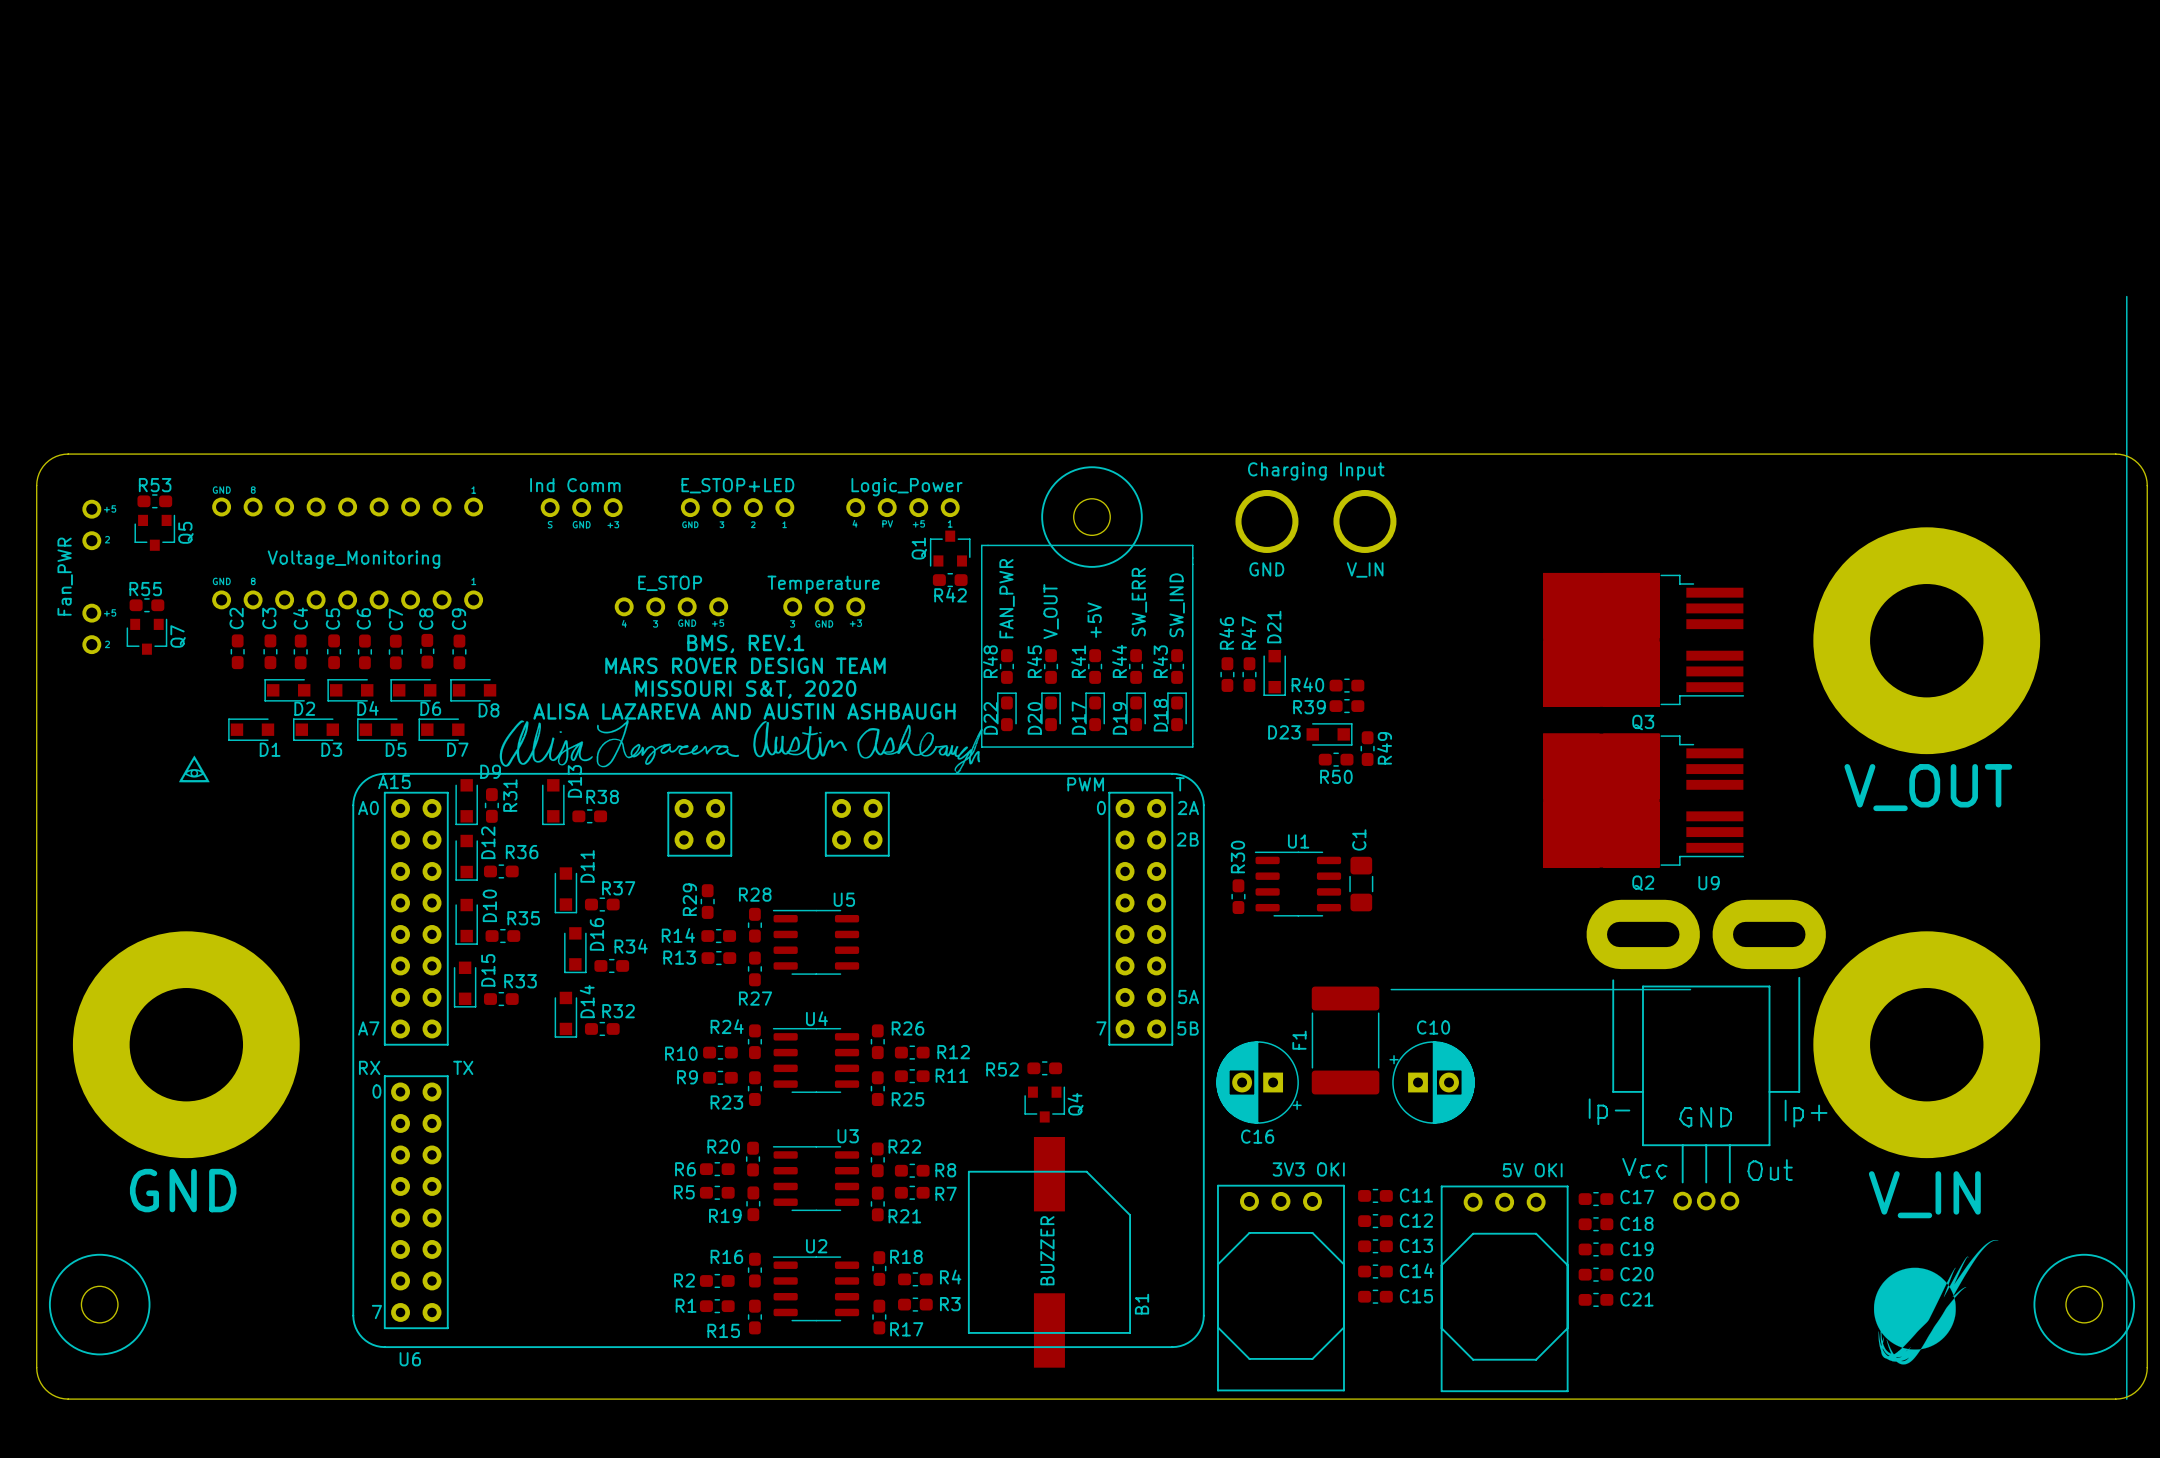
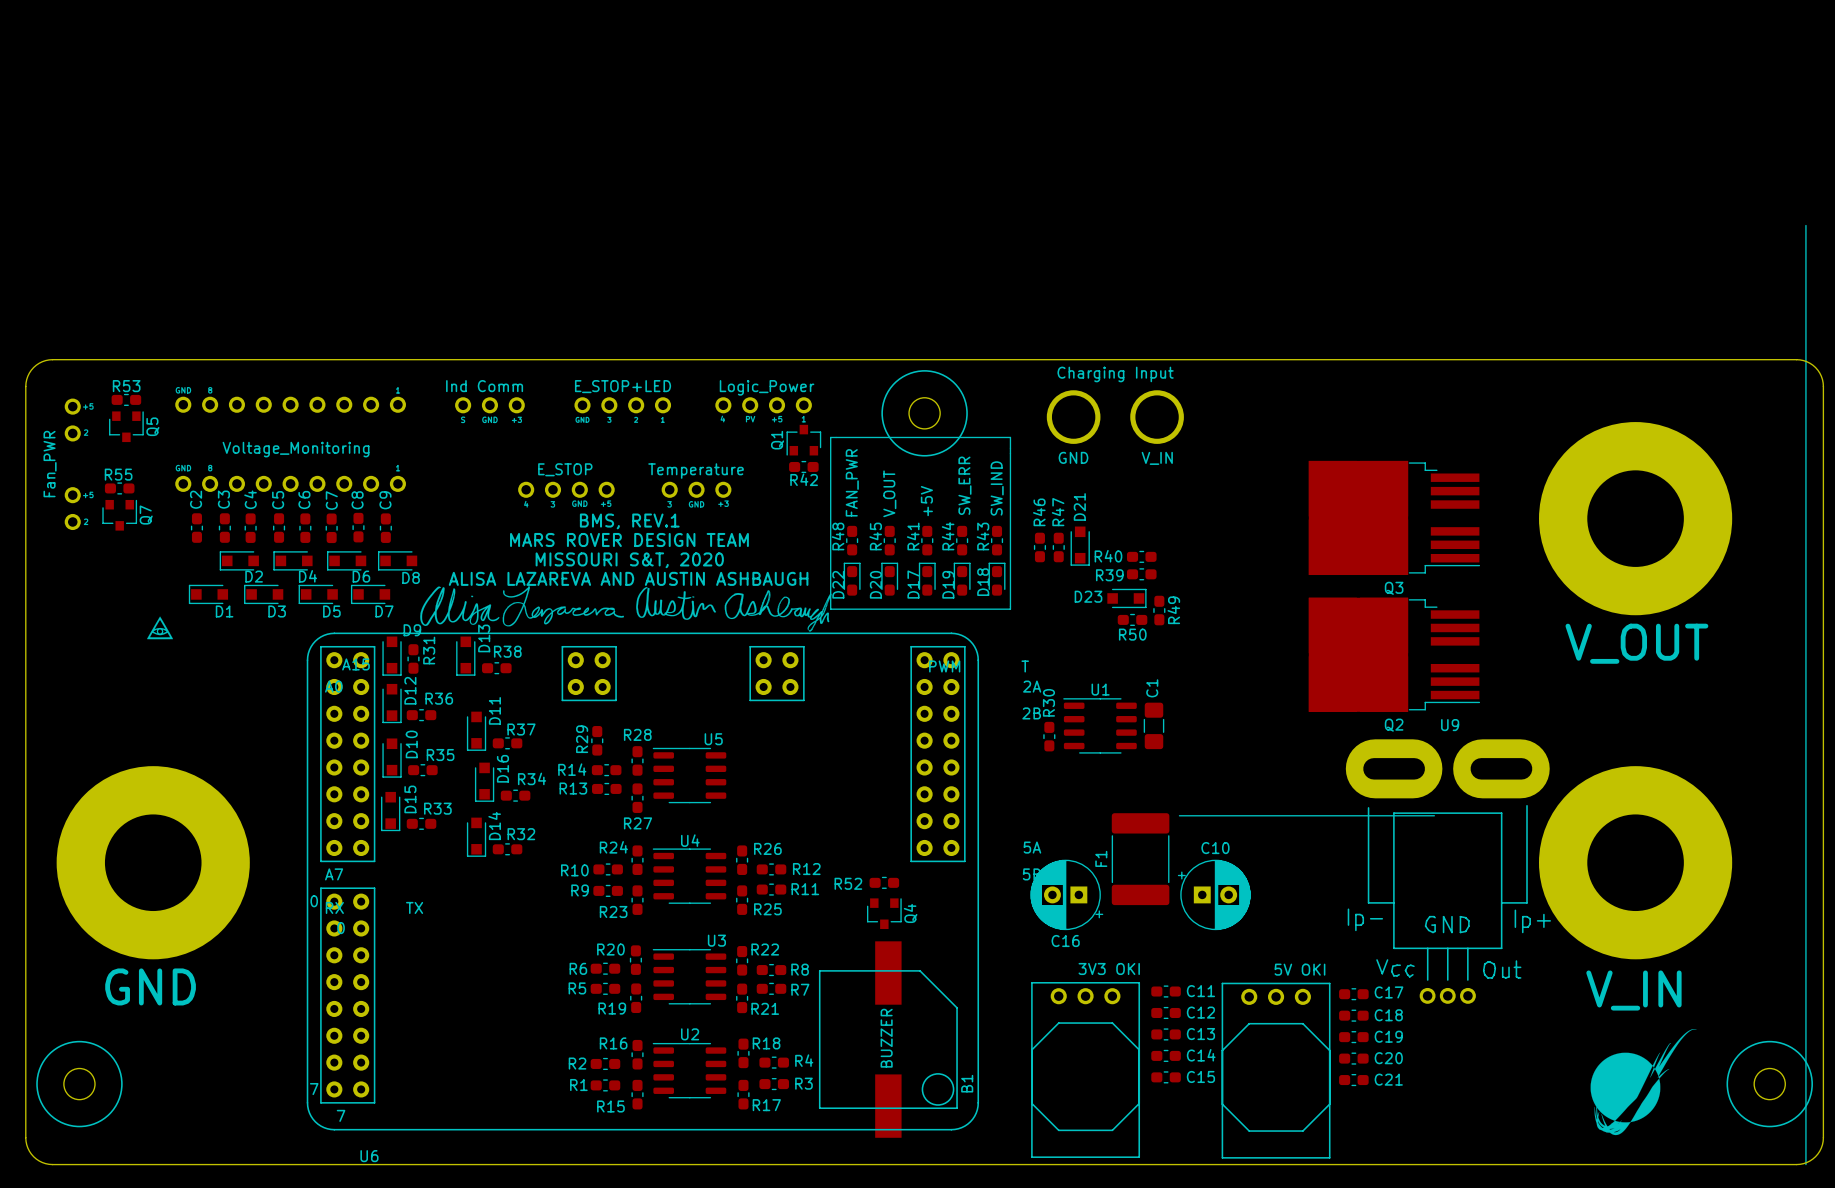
U6 footprint: [352, 772, 1205, 1349] -> [306, 632, 980, 1131]
U6 name position: U6 (410, 1359) -> U6 (369, 1156)

